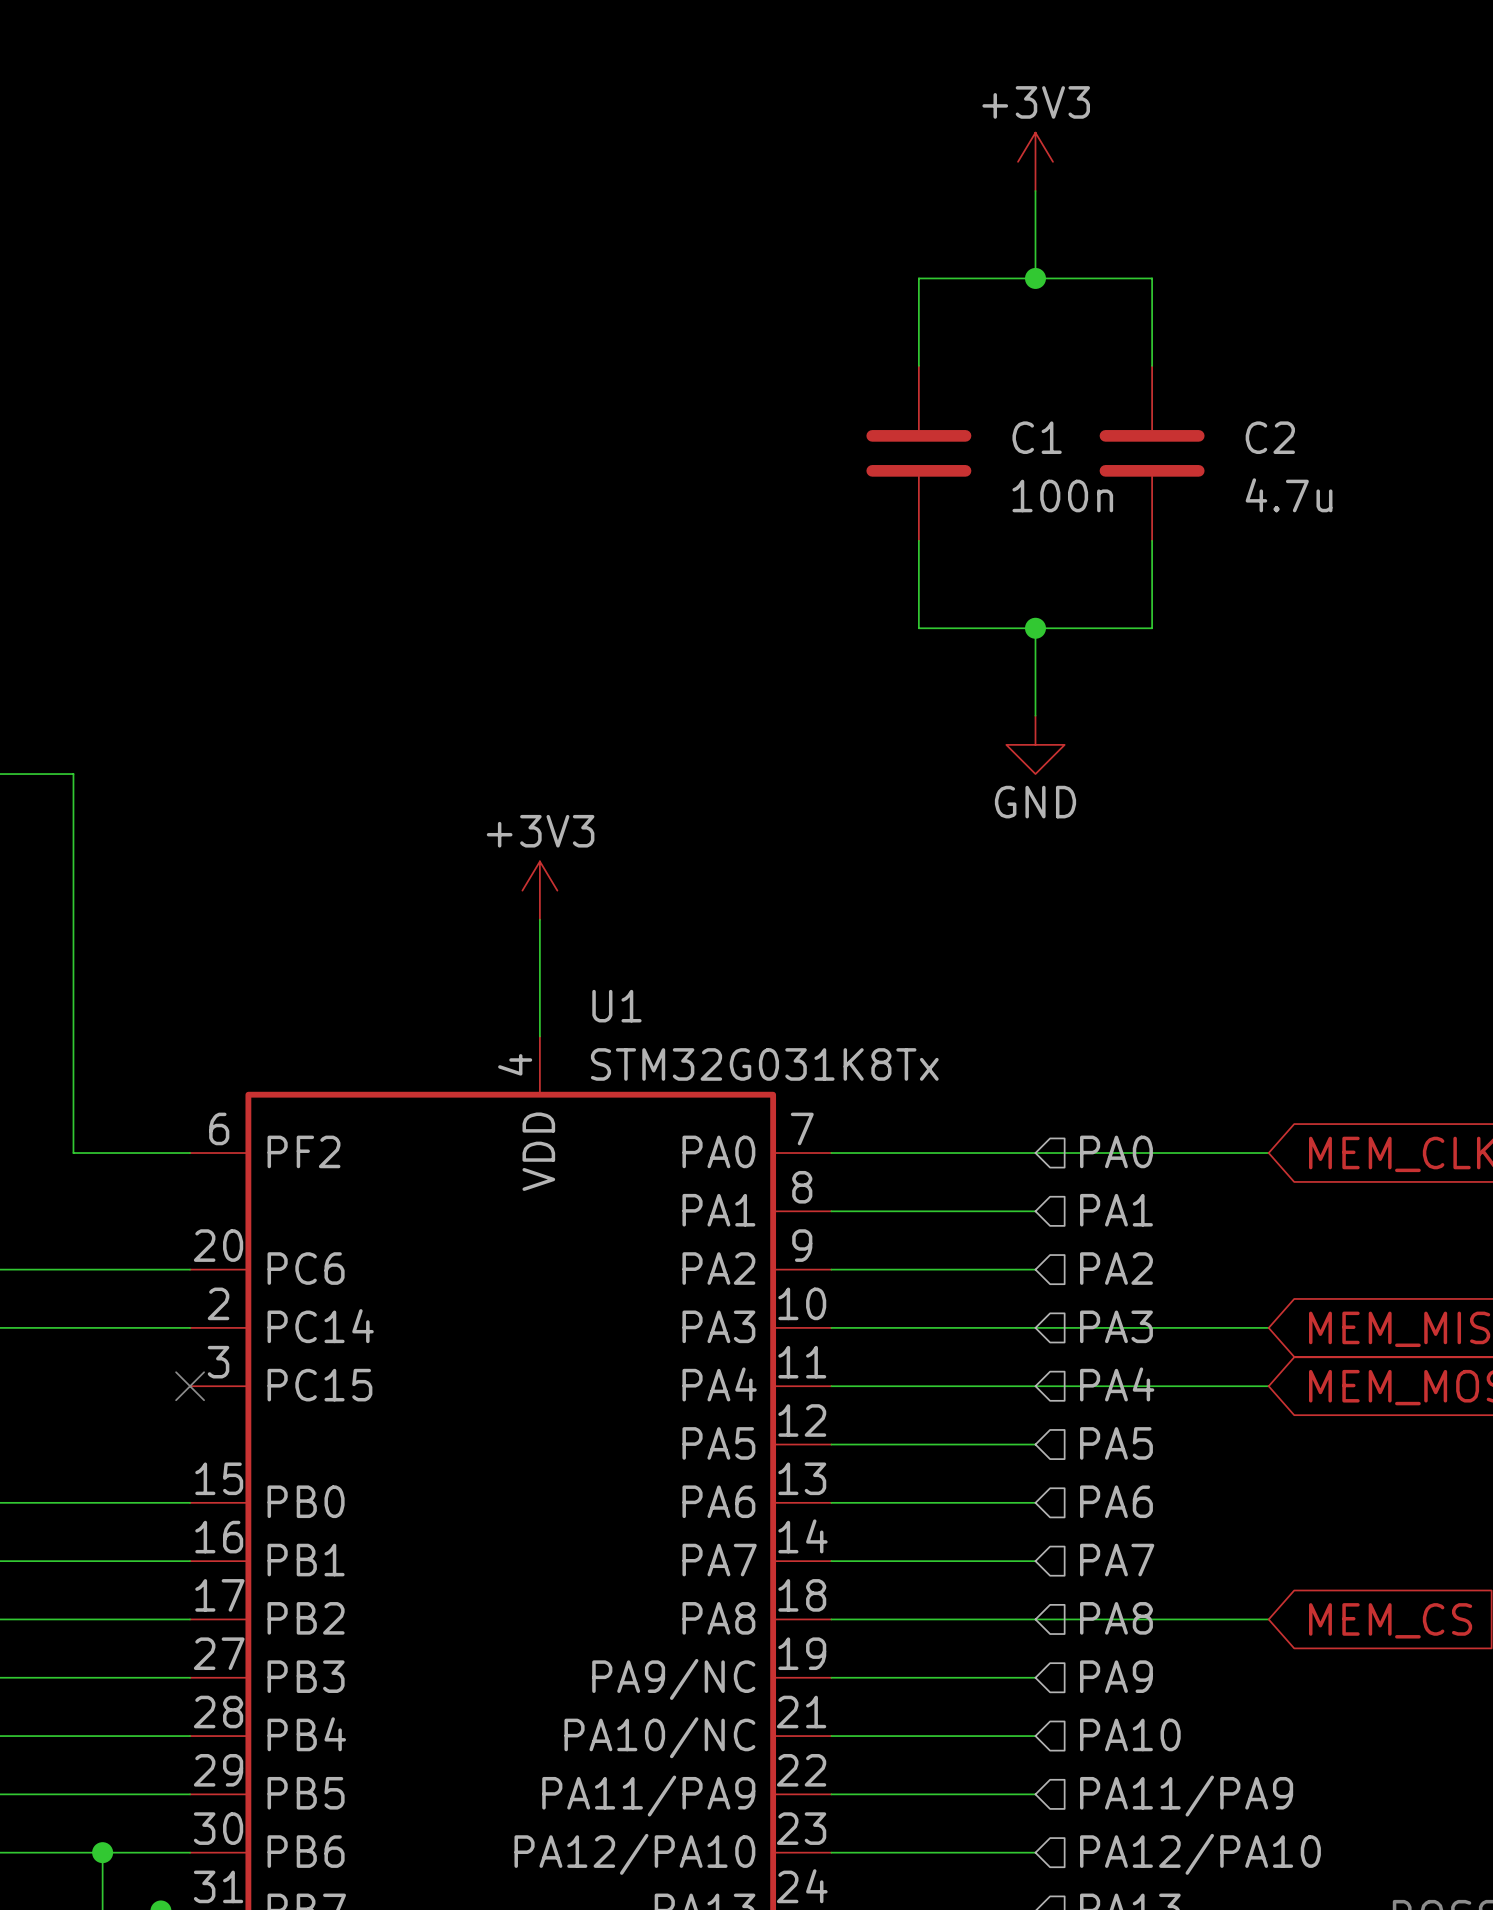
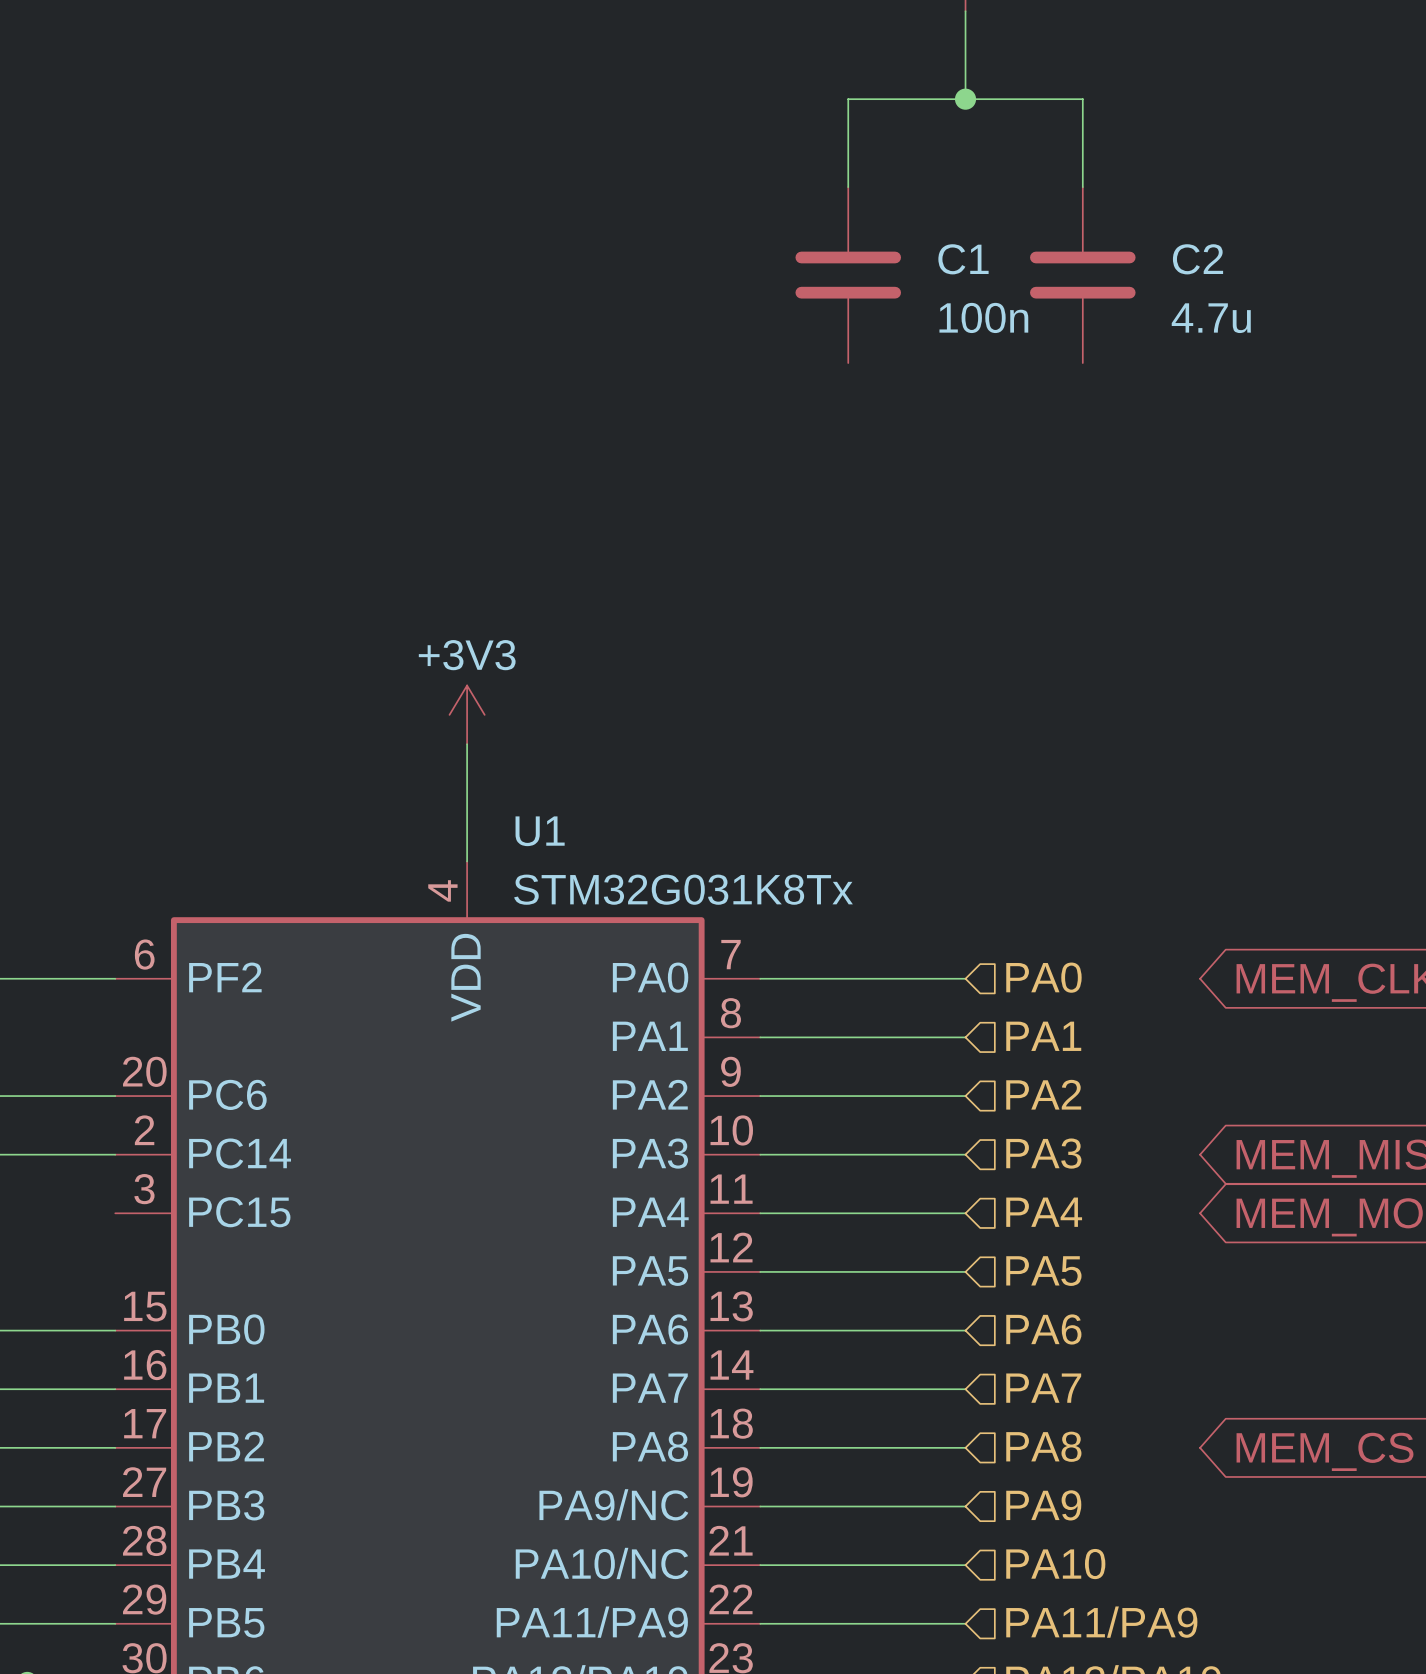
wire: (918, 540) (918, 628) (1152, 628) (1152, 540) -> none
wire: (1035, 628) (1035, 715) -> none
junction: (1035, 628) -> none
power symbol: GND (1035, 744) -> none
wire: (1035, 1153) (1268, 1153) -> none
wire: (1035, 1327) (1268, 1327) -> none
no-connect mark: (190, 1386) -> none
wire: (1035, 1386) (1268, 1386) -> none
wire: (1035, 1619) (1268, 1619) -> none

